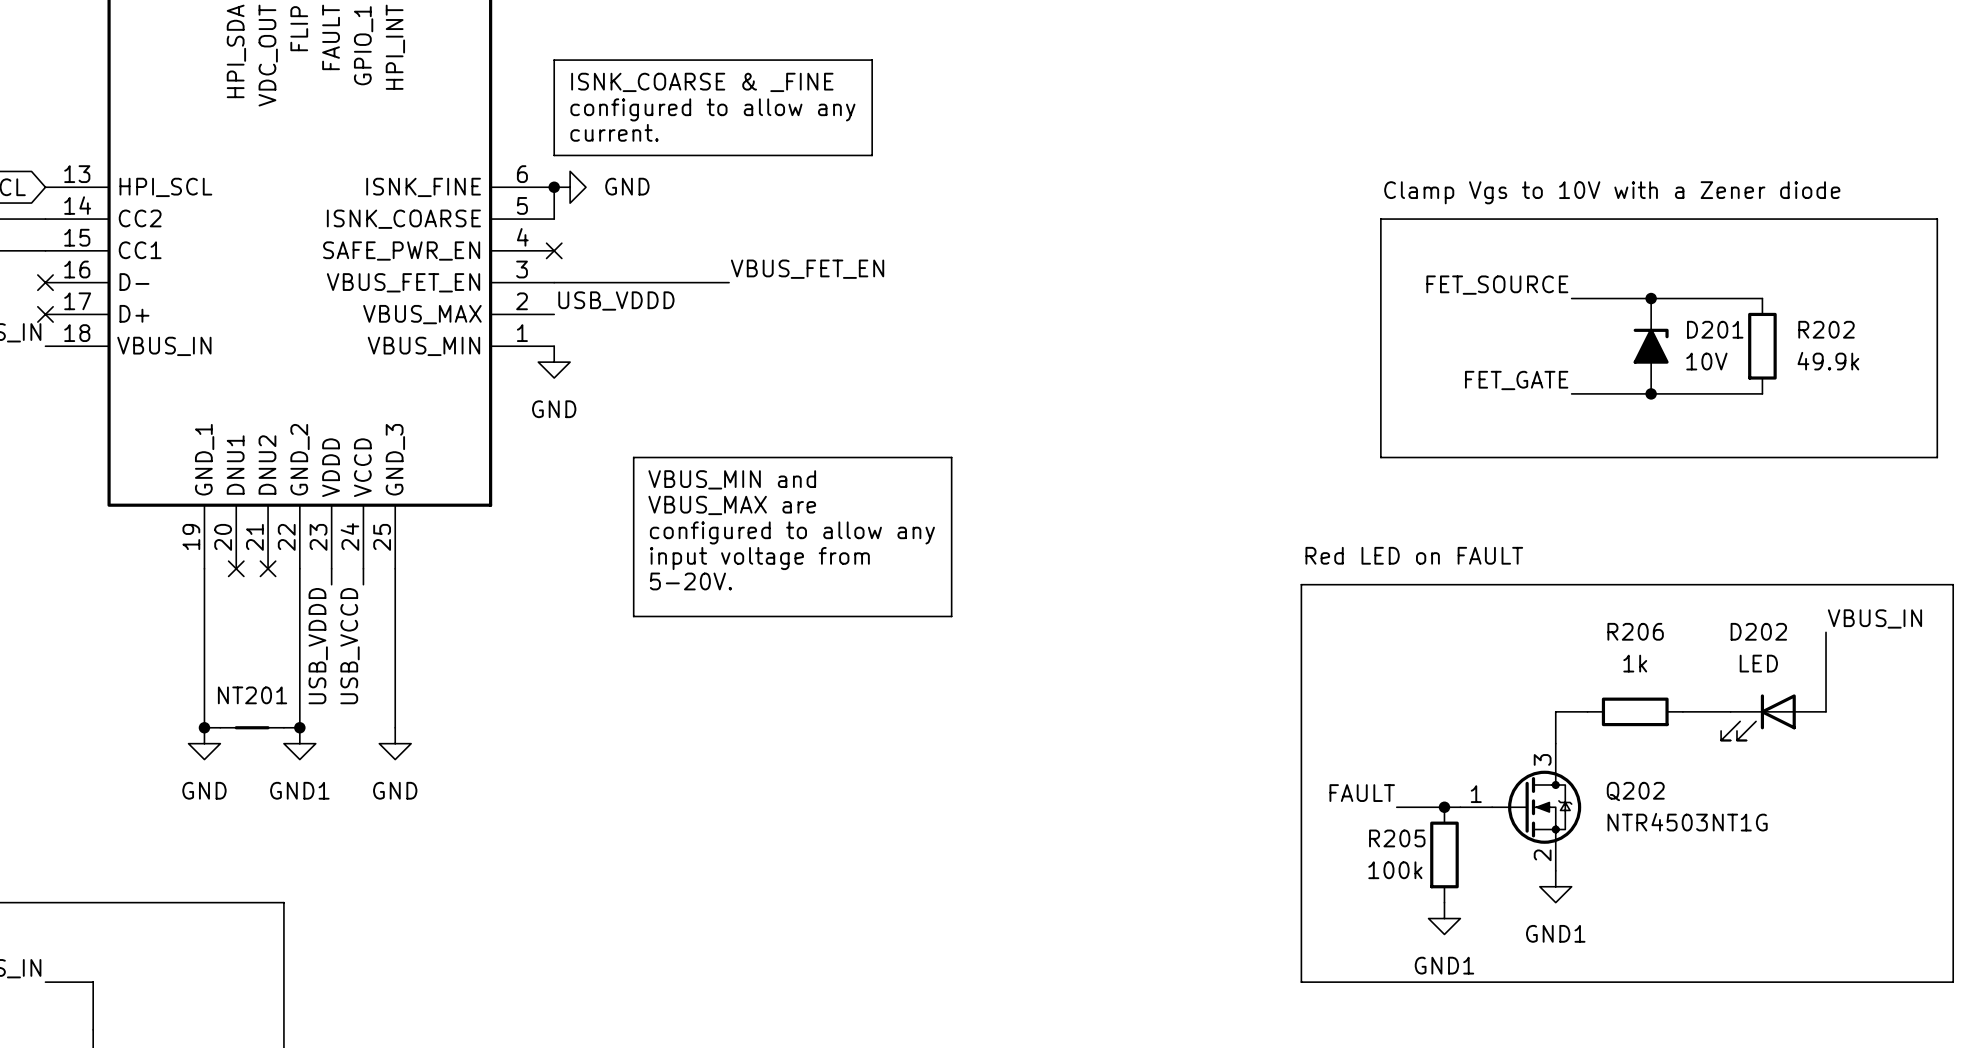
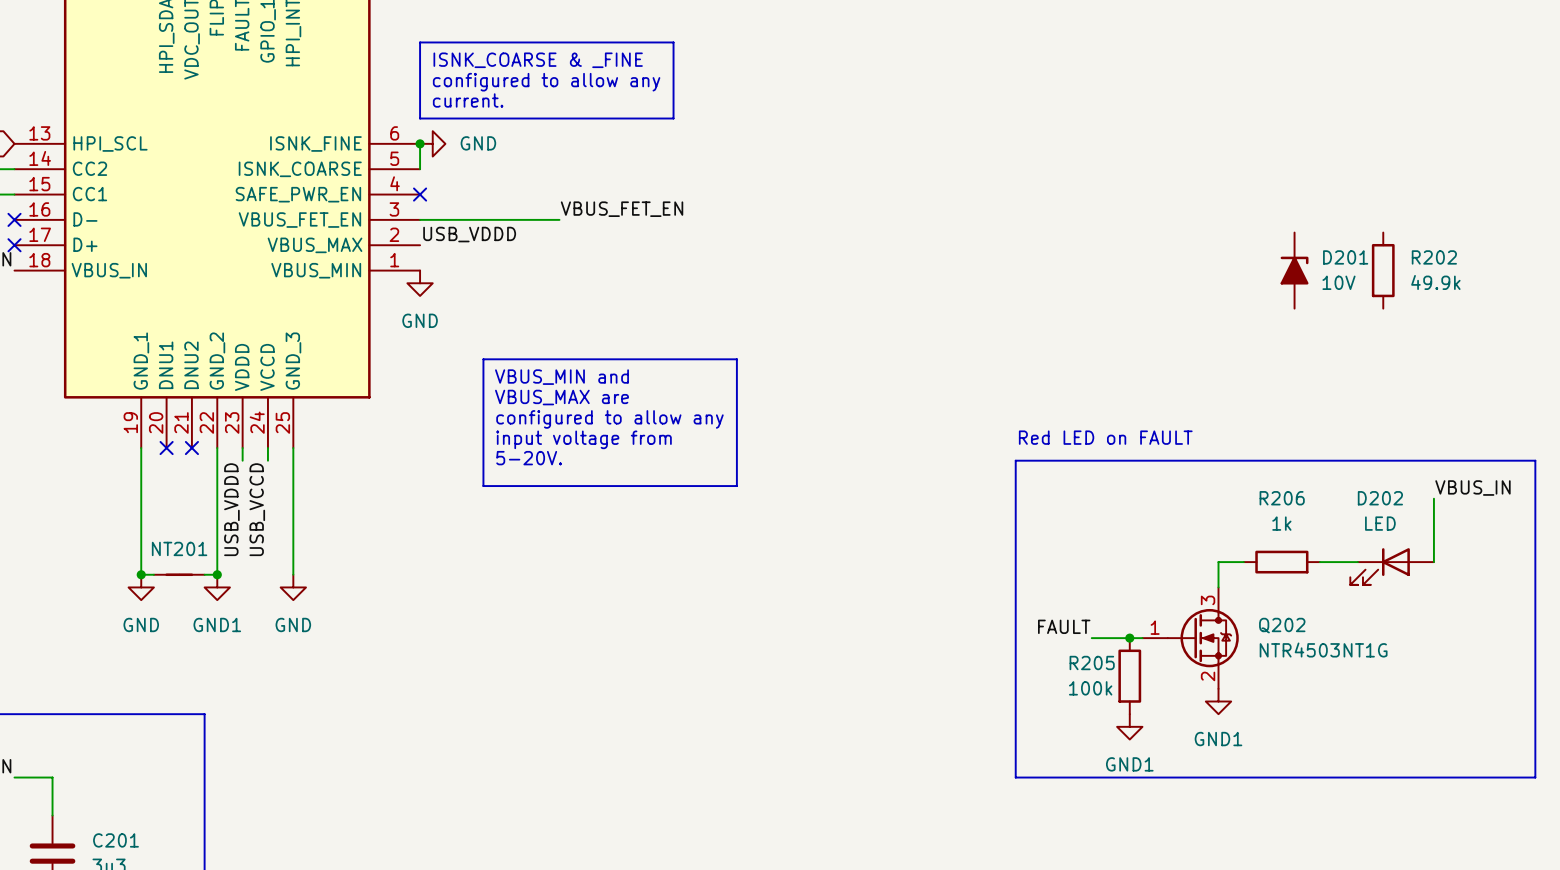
text: Clamp Vgs to 10V with a Zener diode (1612, 192) -> none
line: (1380, 219) (1937, 219) (1937, 457) (1380, 457) (1380, 219) -> none
label: FET_SOURCE (1497, 285) -> none
wire: (1571, 298) (1762, 298) -> none
junction: (1651, 298) -> none
label: FET_GATE (1516, 380) -> none
wire: (1571, 393) (1762, 393) -> none
junction: (1651, 393) -> none

